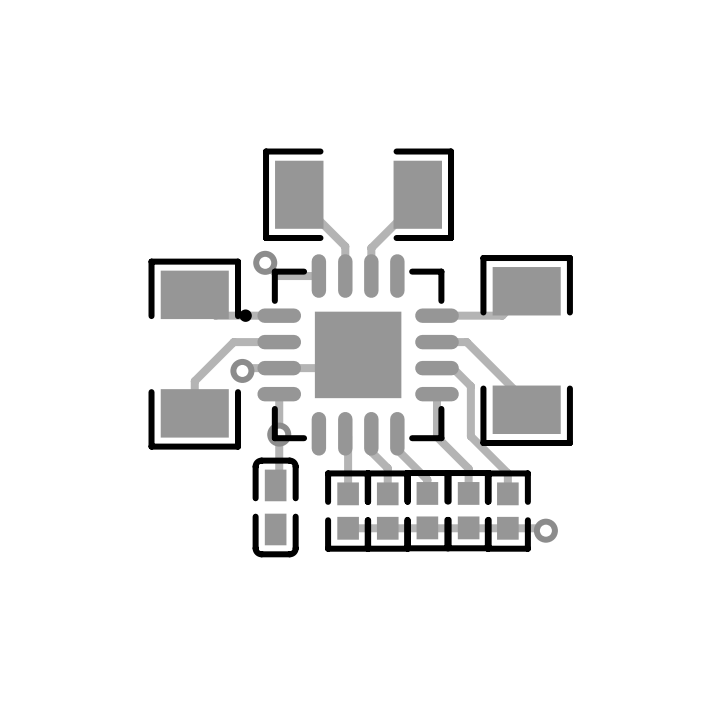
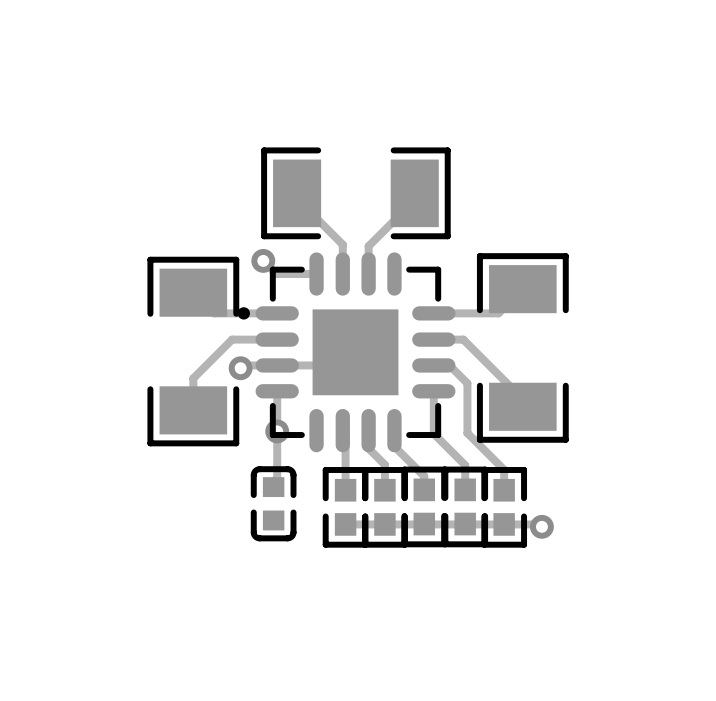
part footprint: [252, 457, 299, 558] -> [250, 466, 297, 542]

